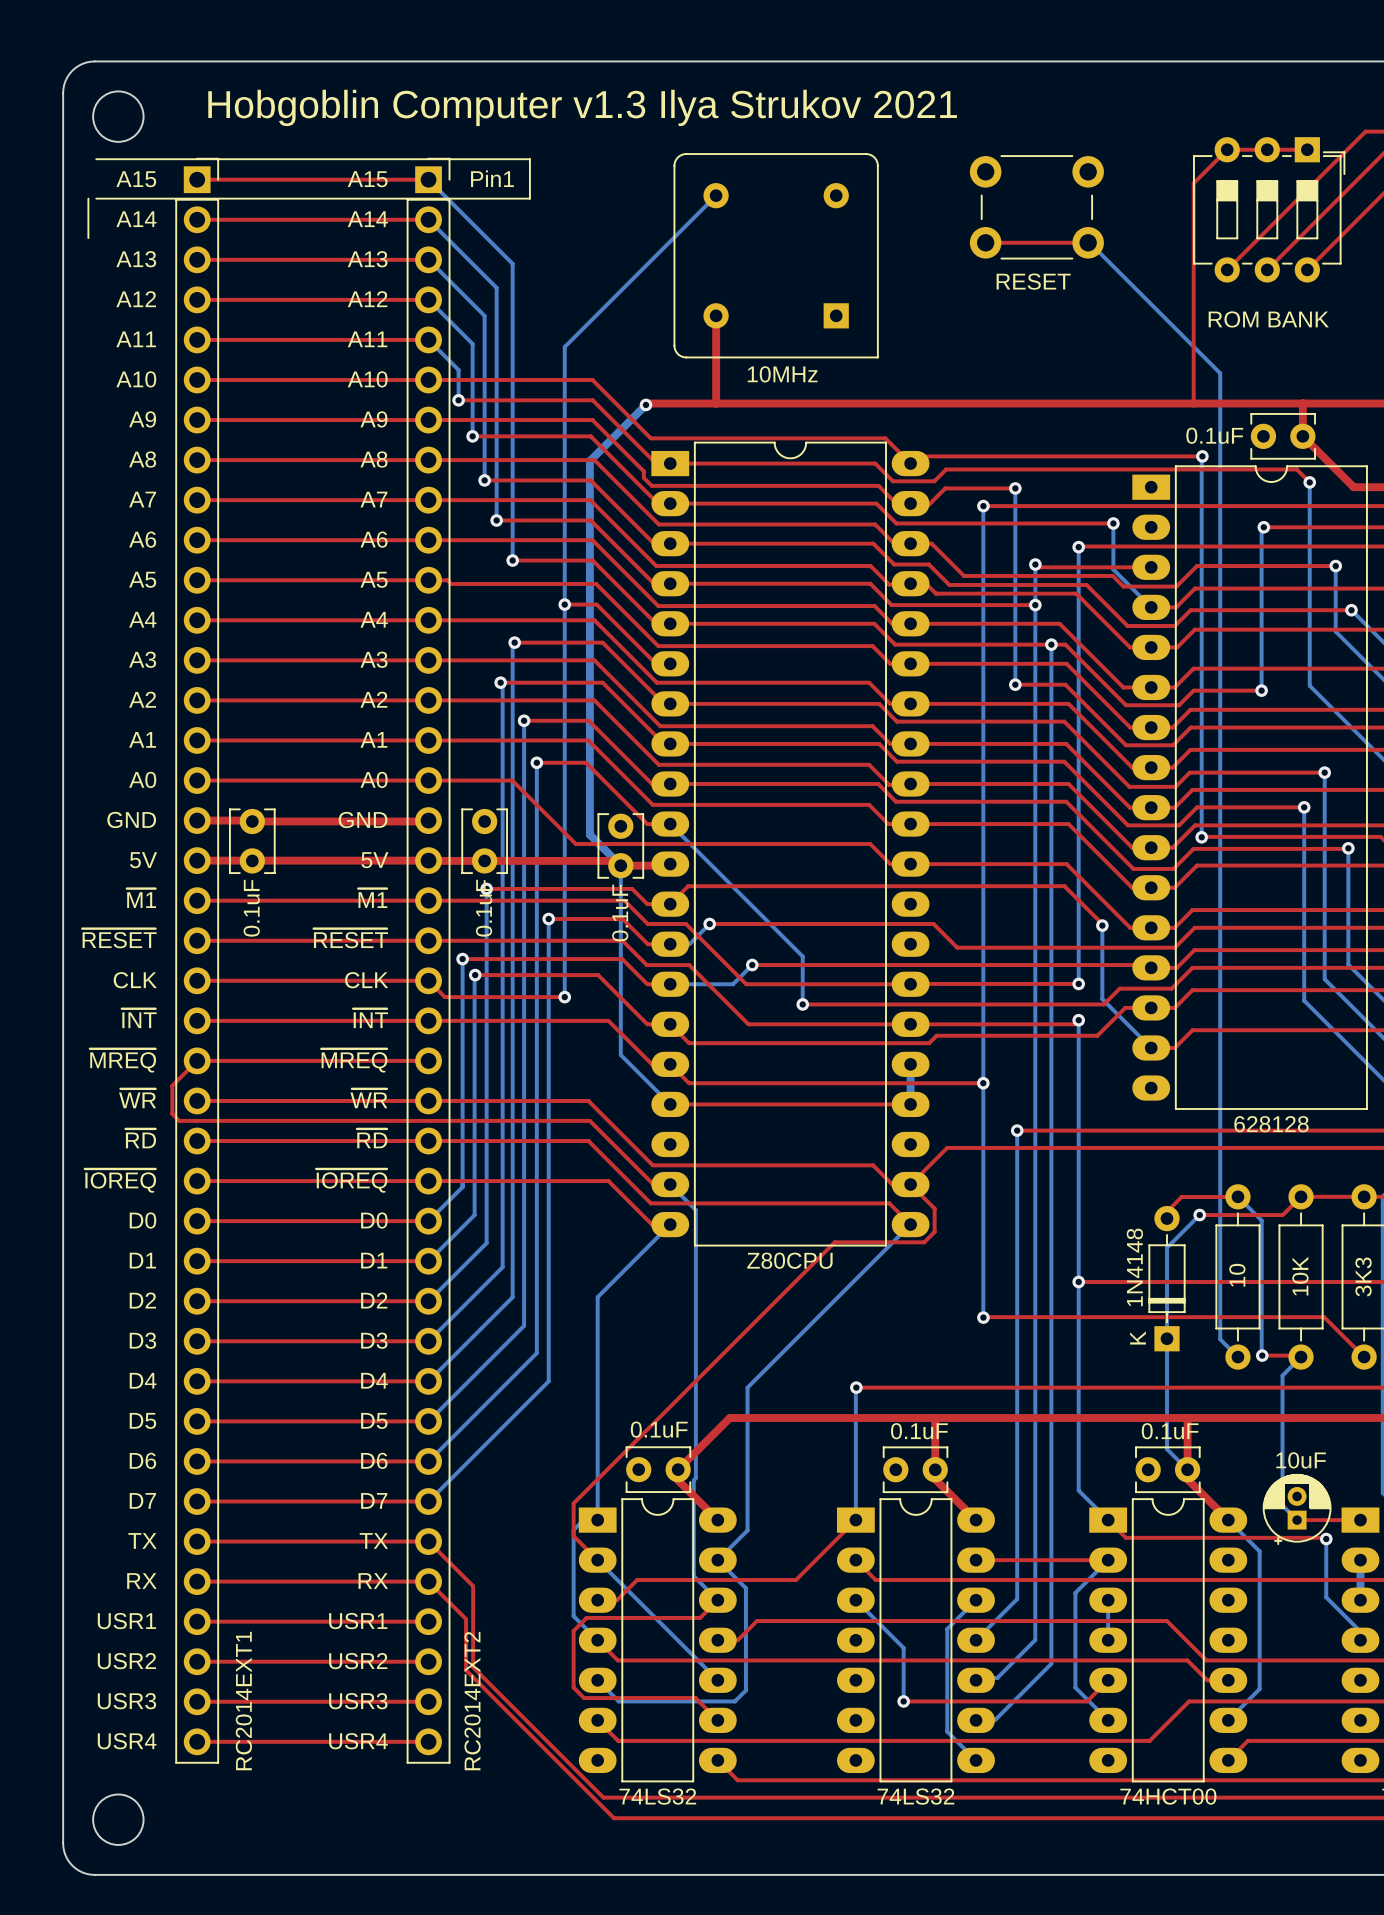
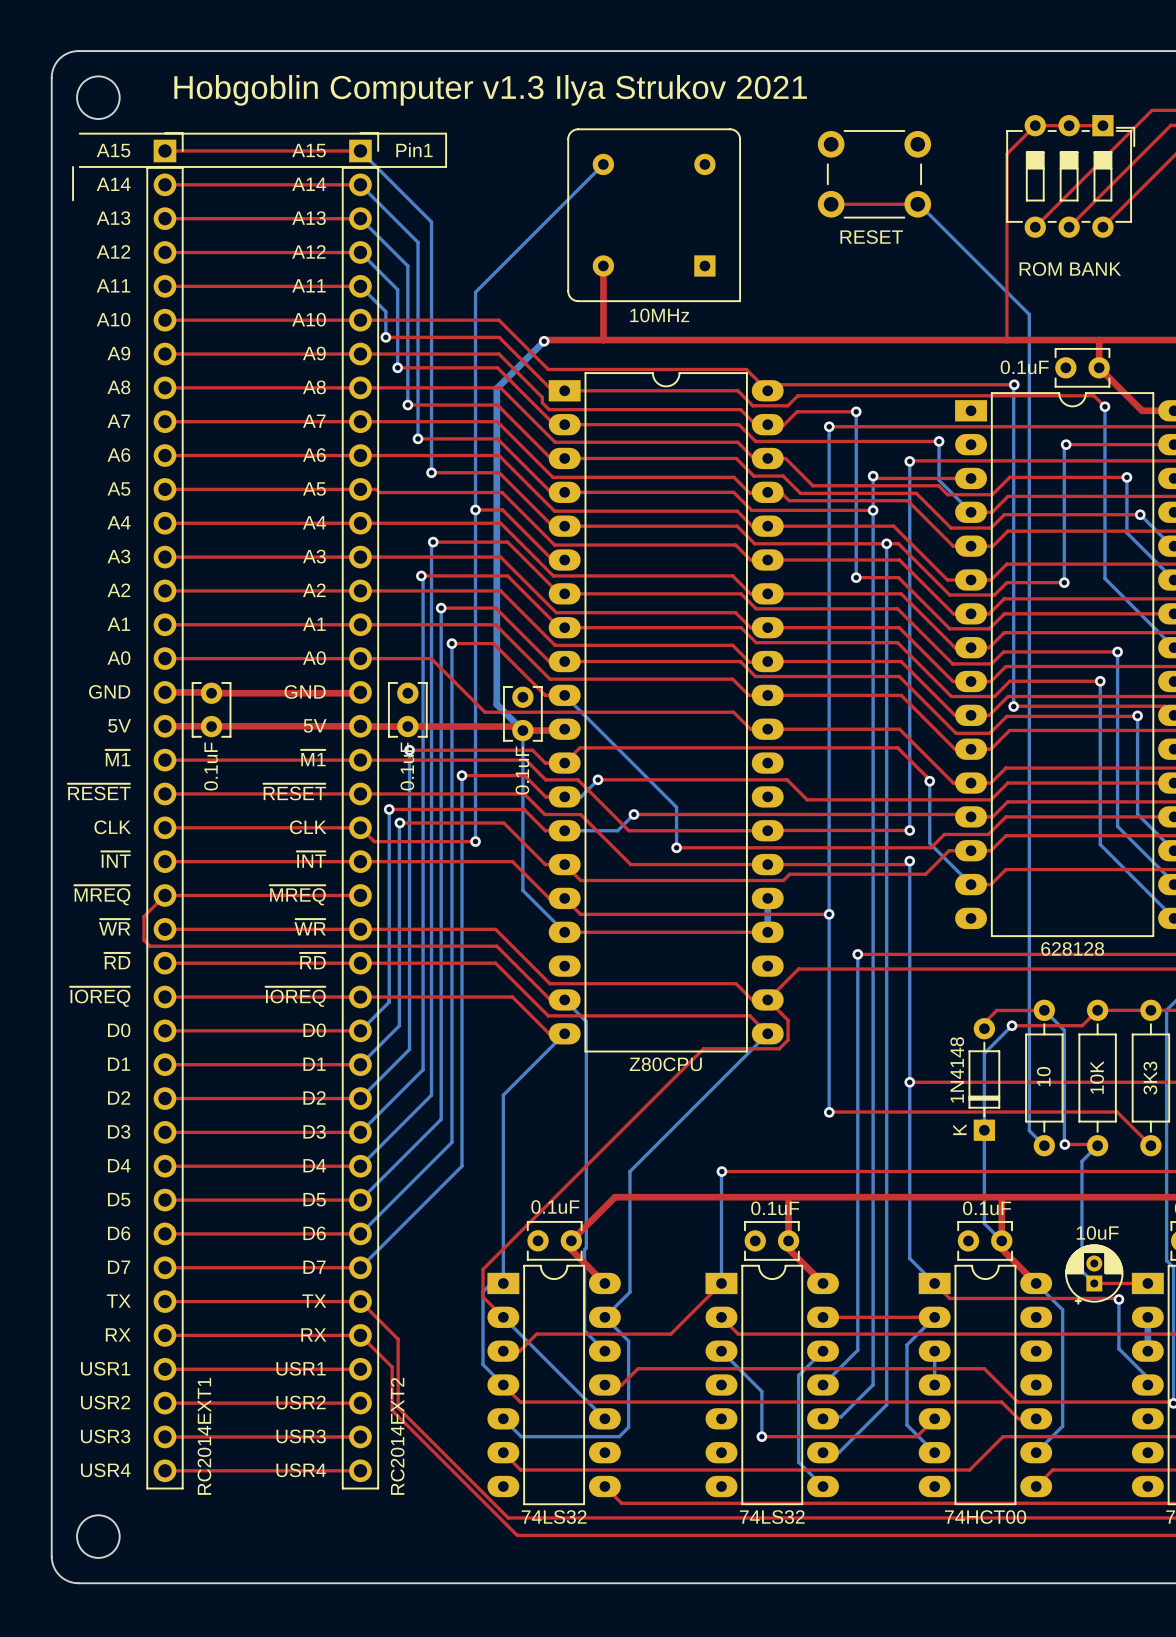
top track: (717, 1600) (700, 1617) (586, 1617) (573, 1630) (573, 1687) (584, 1698) (695, 1698) (717, 1720) -> none

